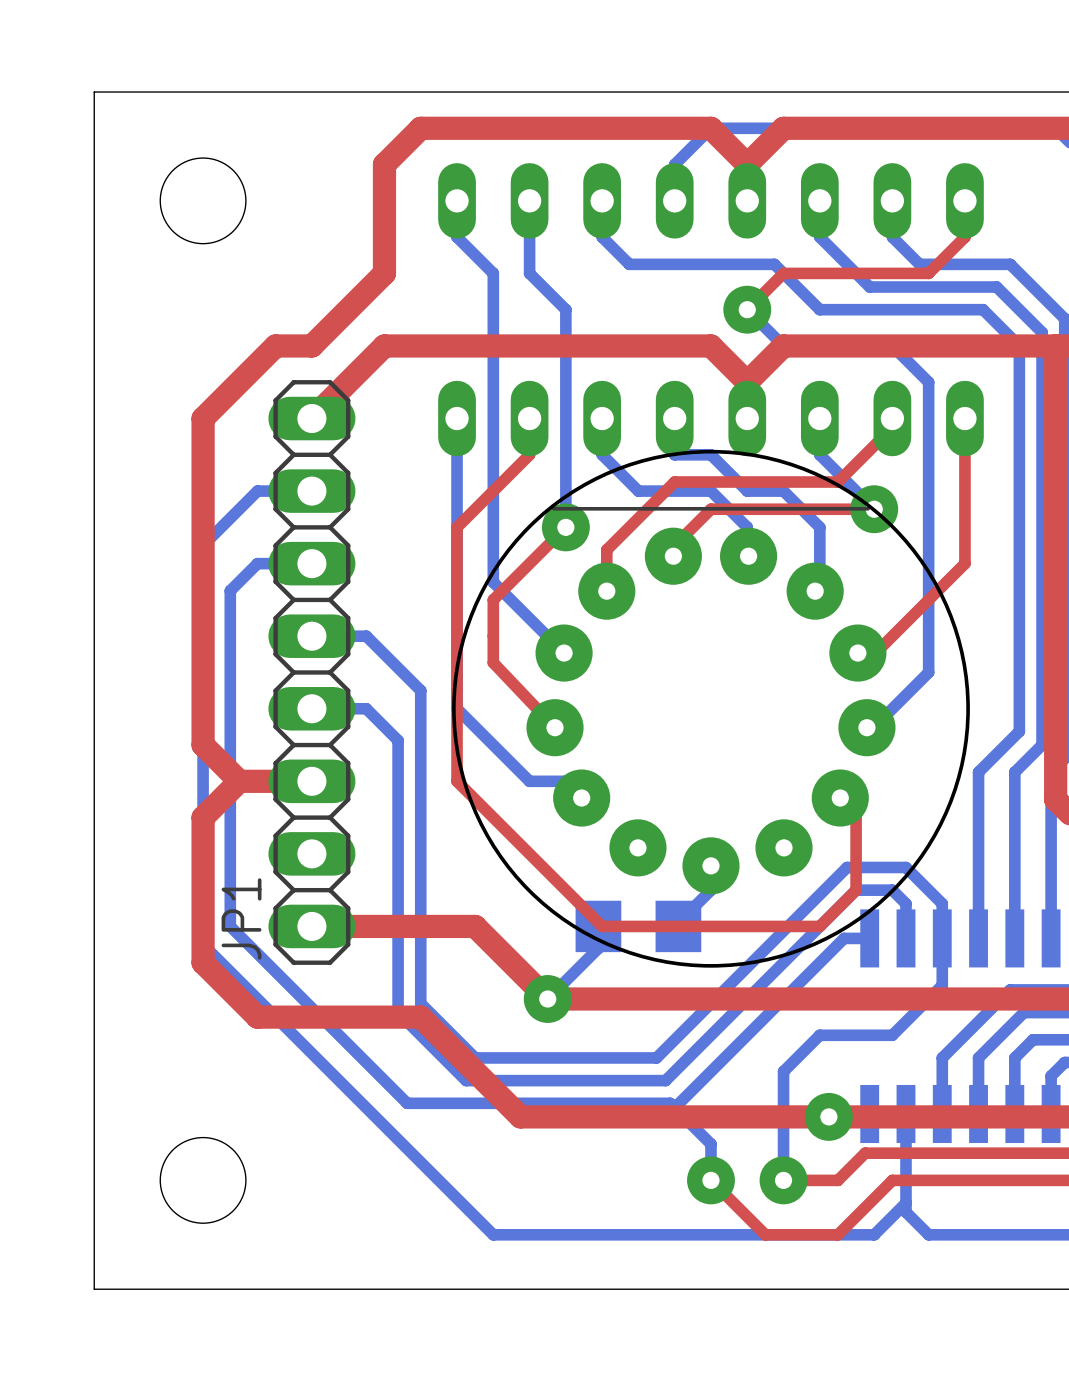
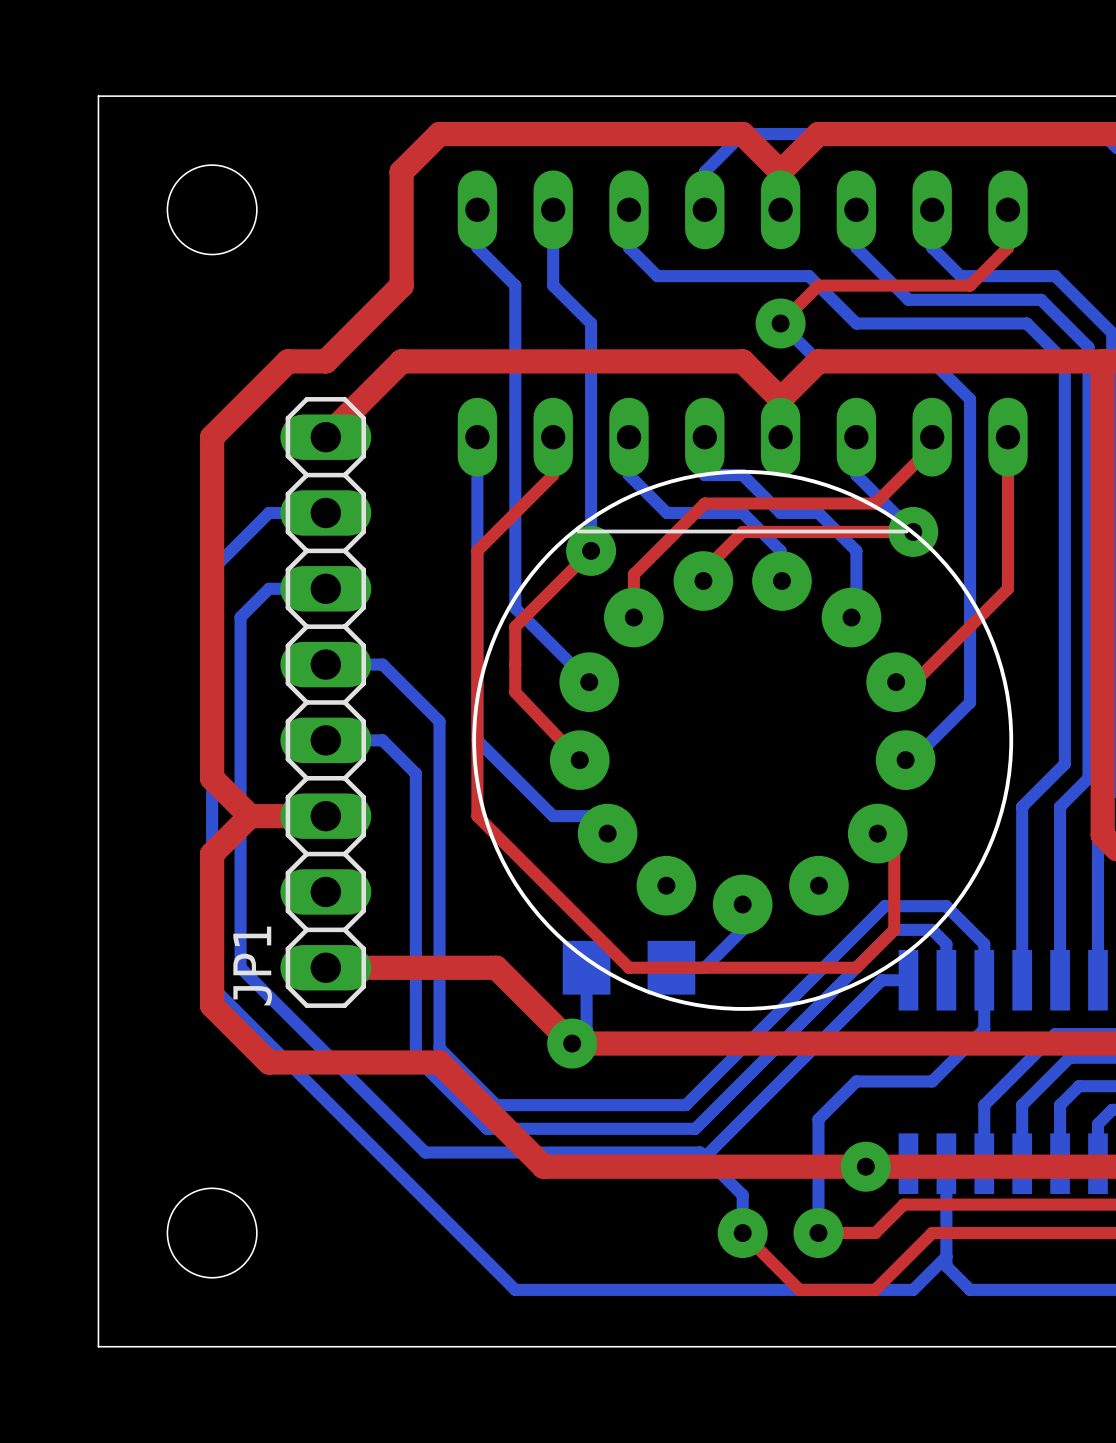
bottom track: (598, 926) (598, 948) (561, 985) -> (586, 967) (586, 1029)
part: none -> (629, 967)
part: (638, 926) -> none

